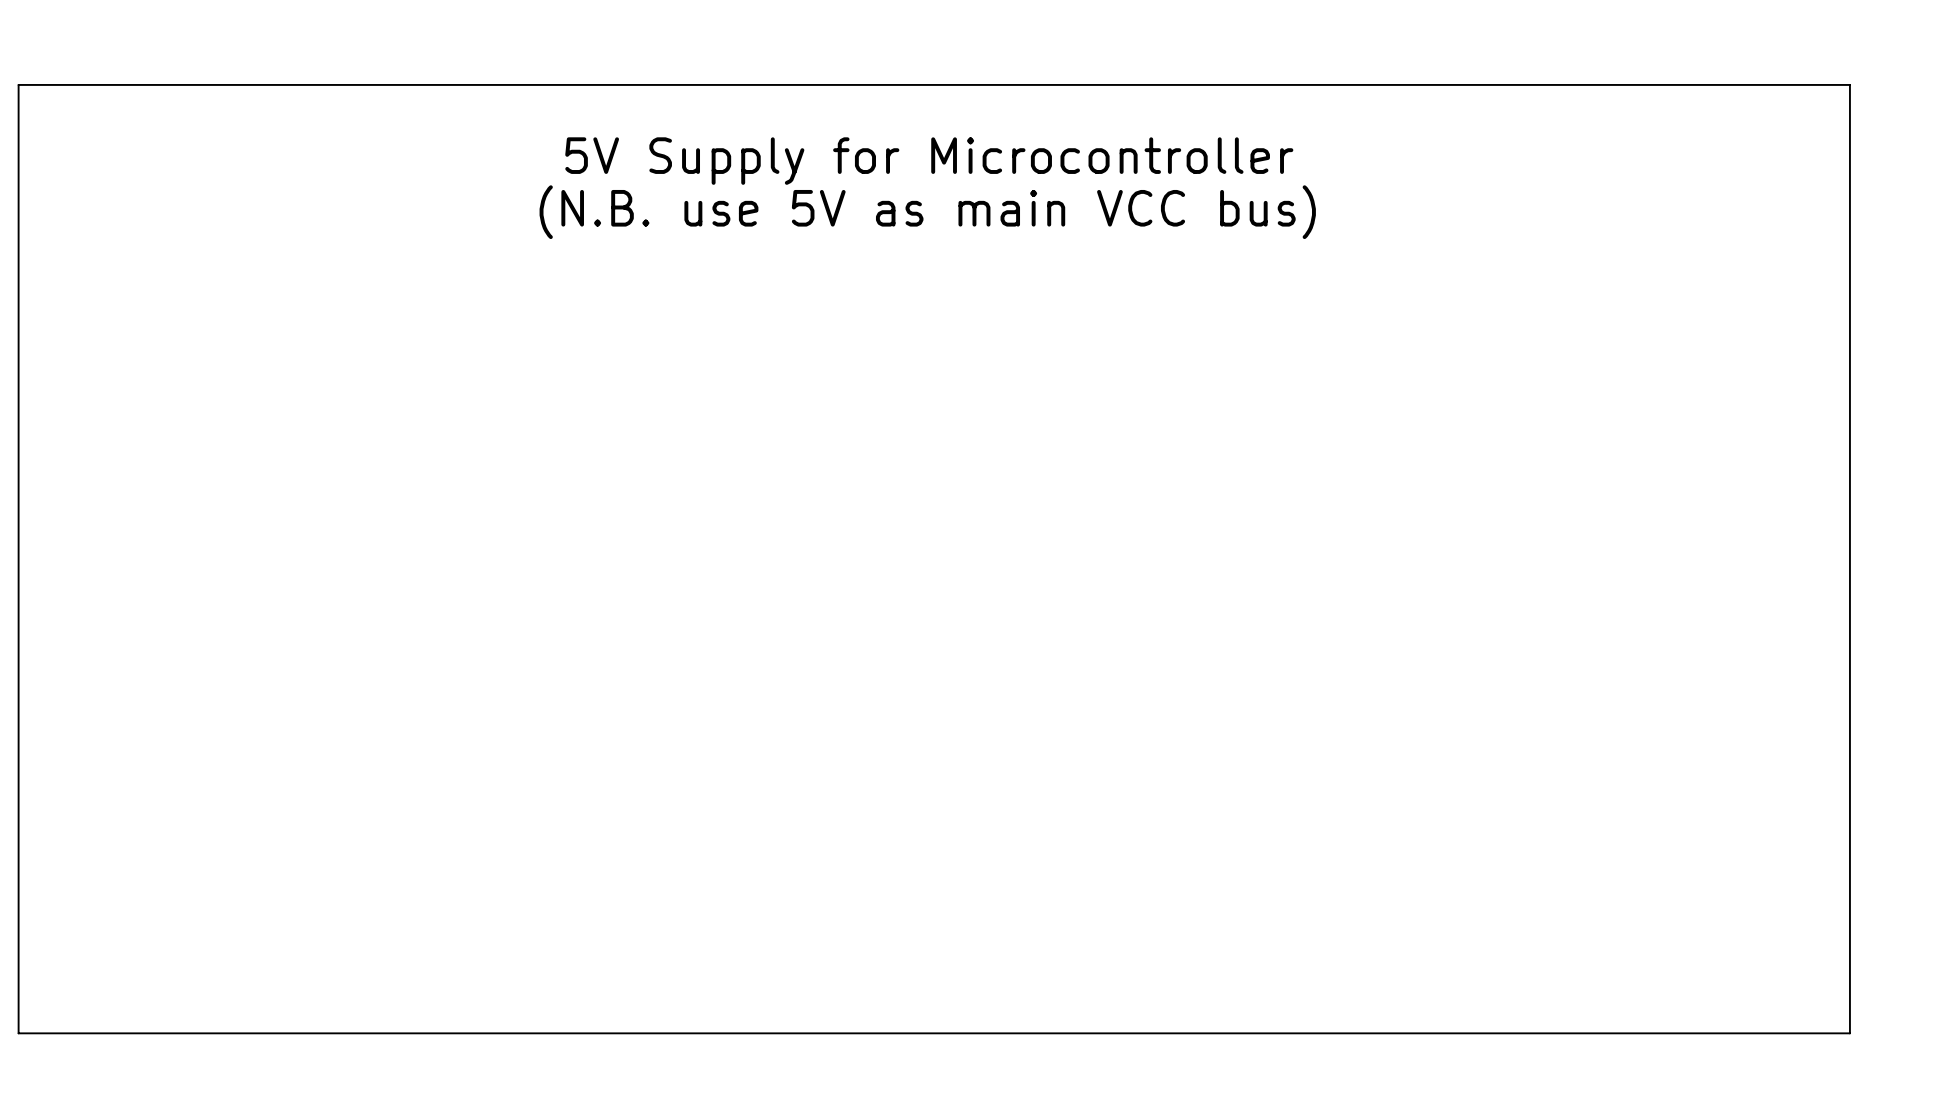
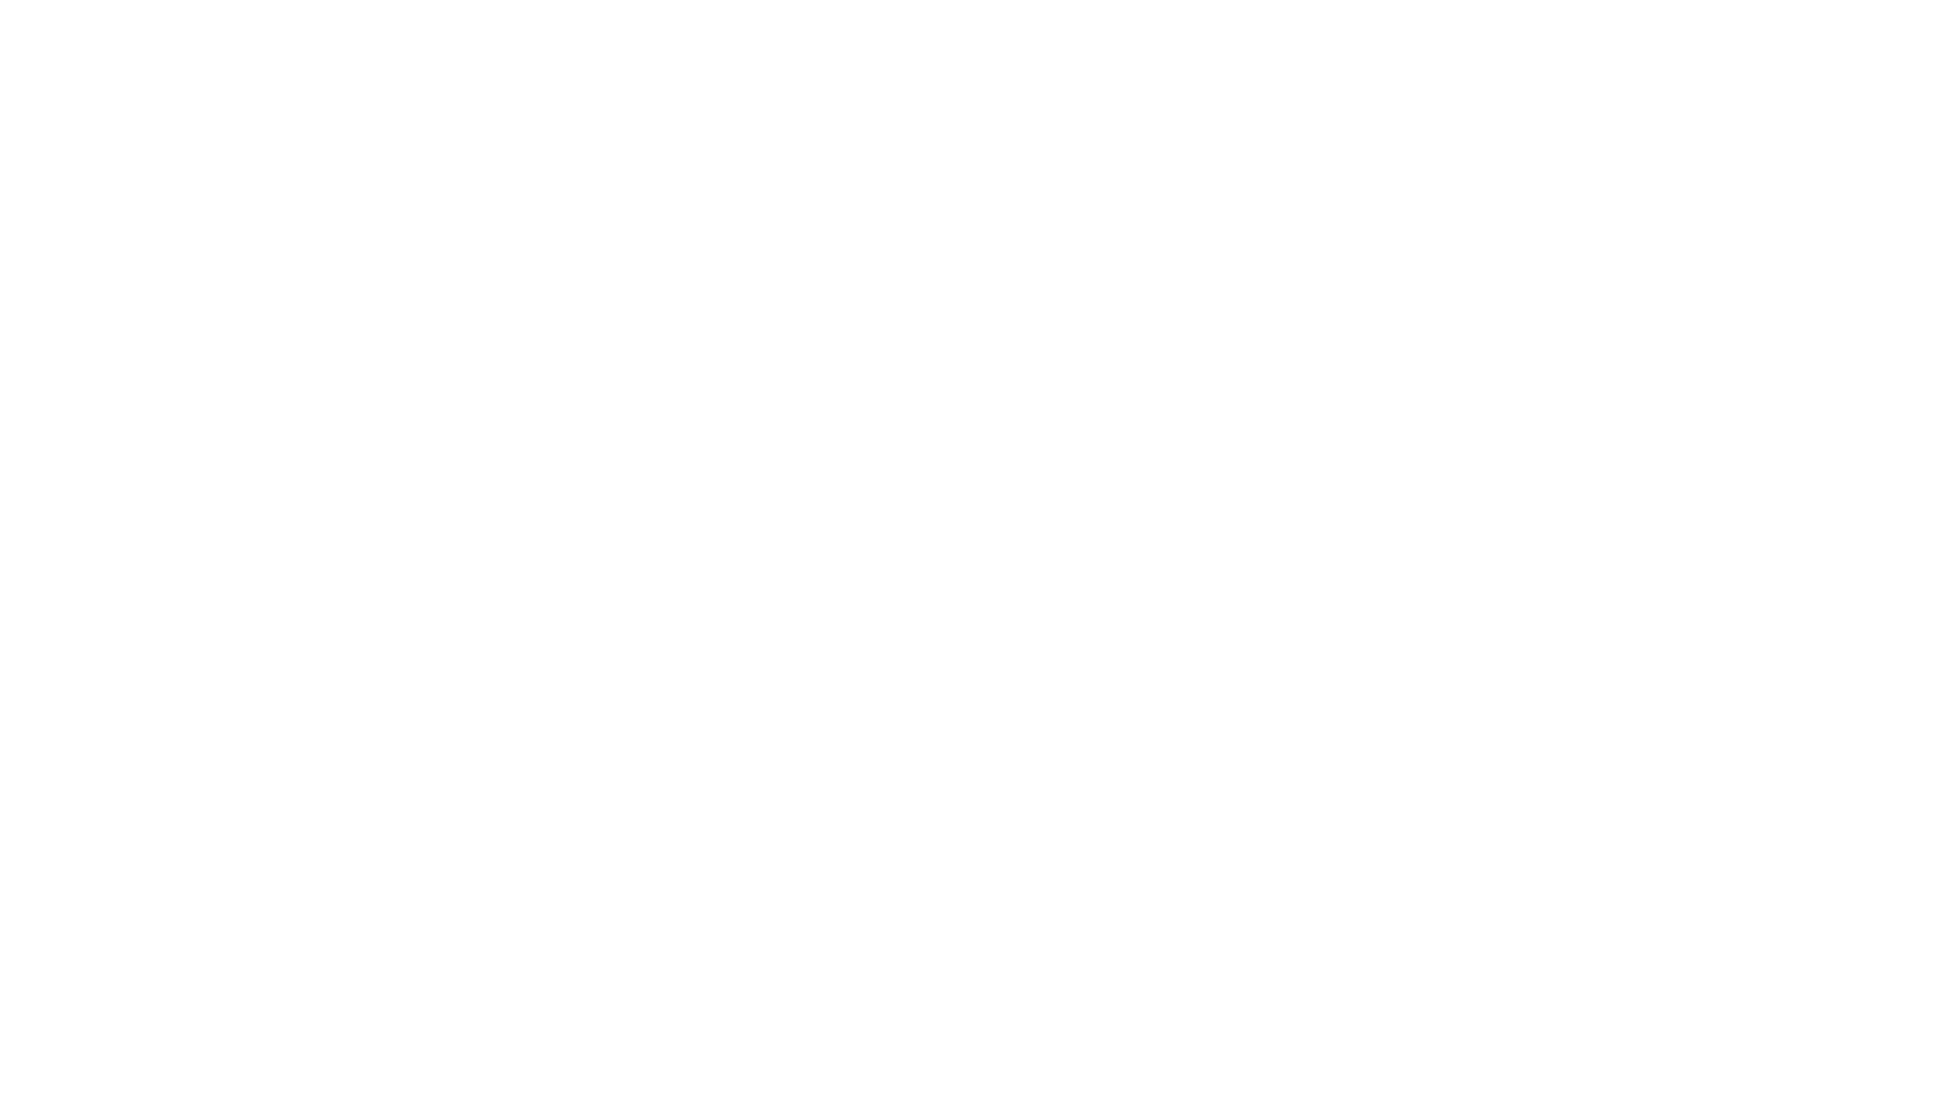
line: (18, 84) (1849, 84) (1849, 1033) (18, 1033) (18, 84) -> none
text: 5V Supply for Microcontroller (929, 161) -> none
text: (N.B. use 5V as main VCC bus) (927, 212) -> none

